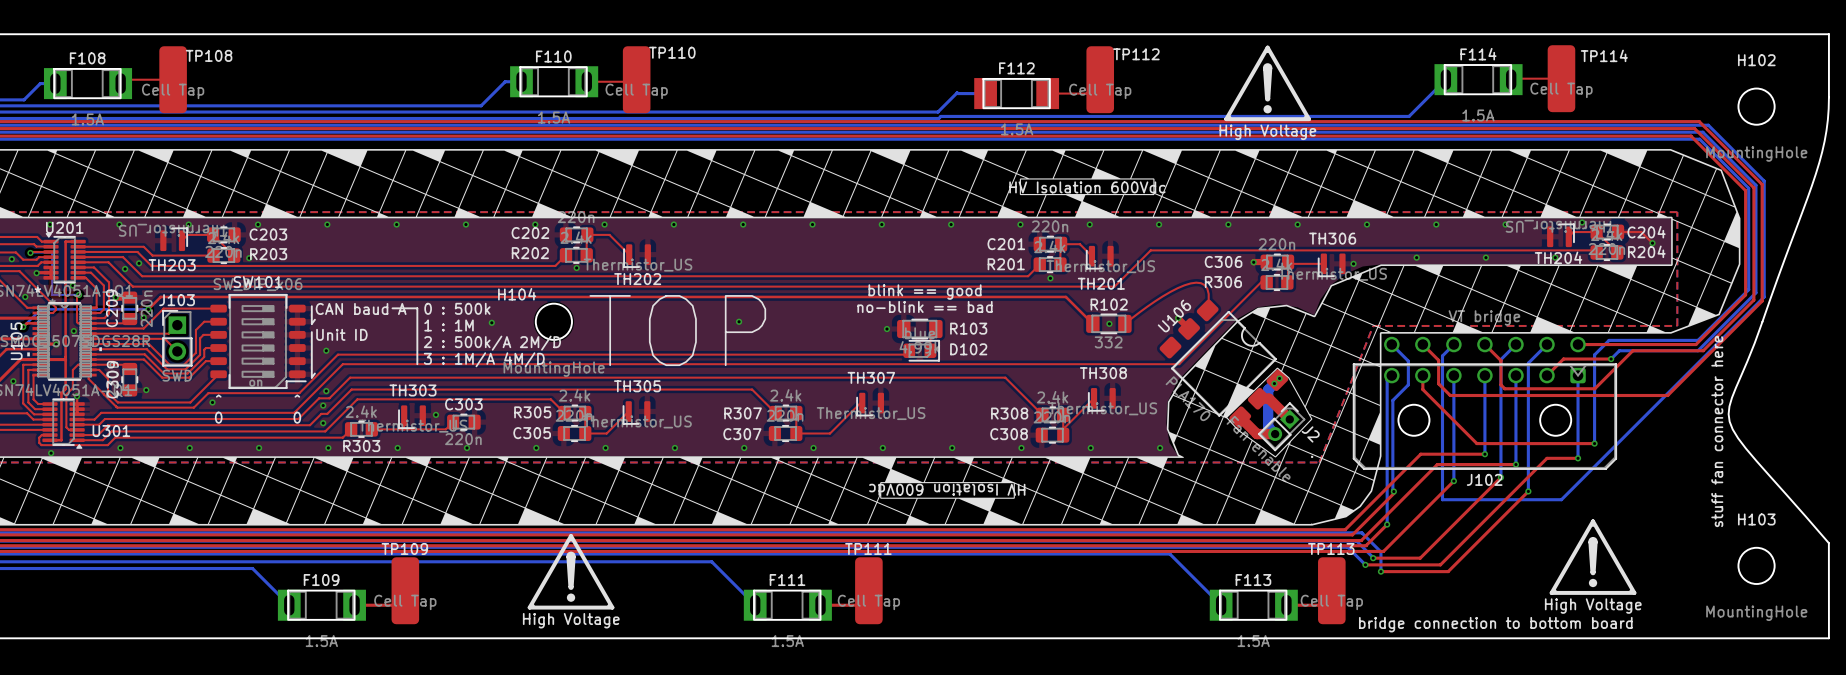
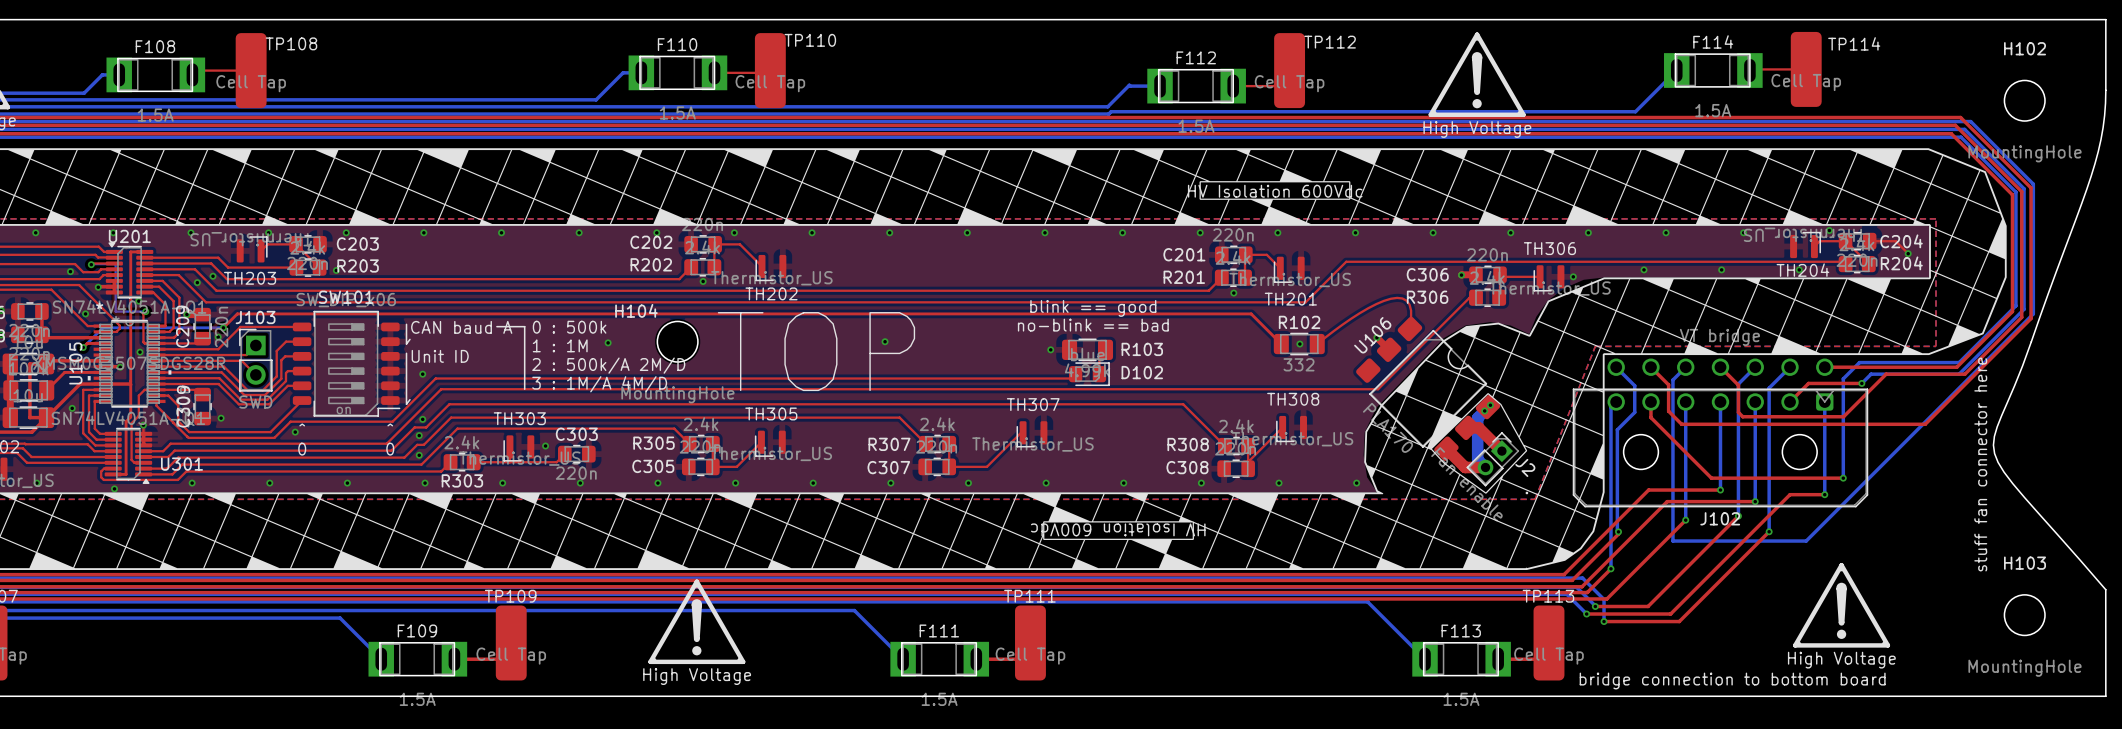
F112 footprint: [974, 78, 1060, 110] -> [1147, 68, 1246, 104]

